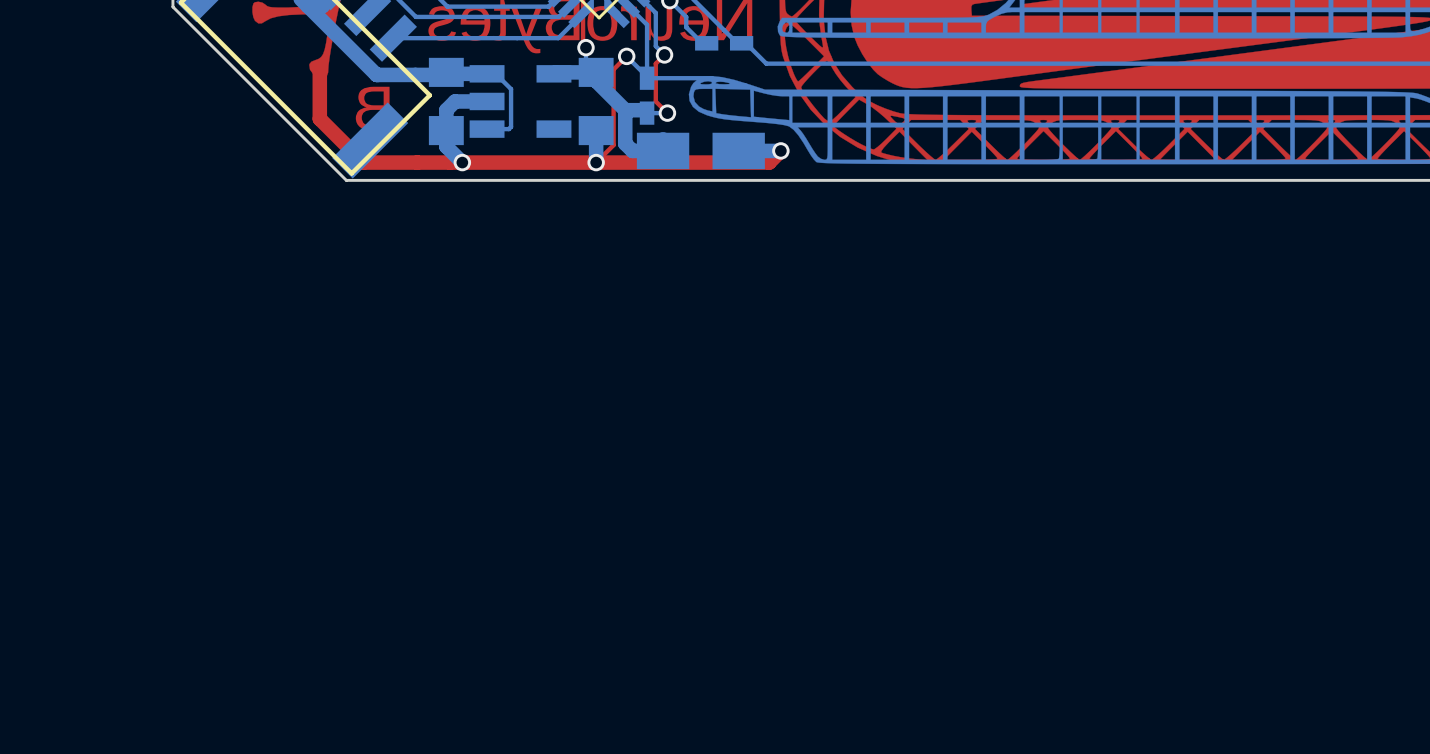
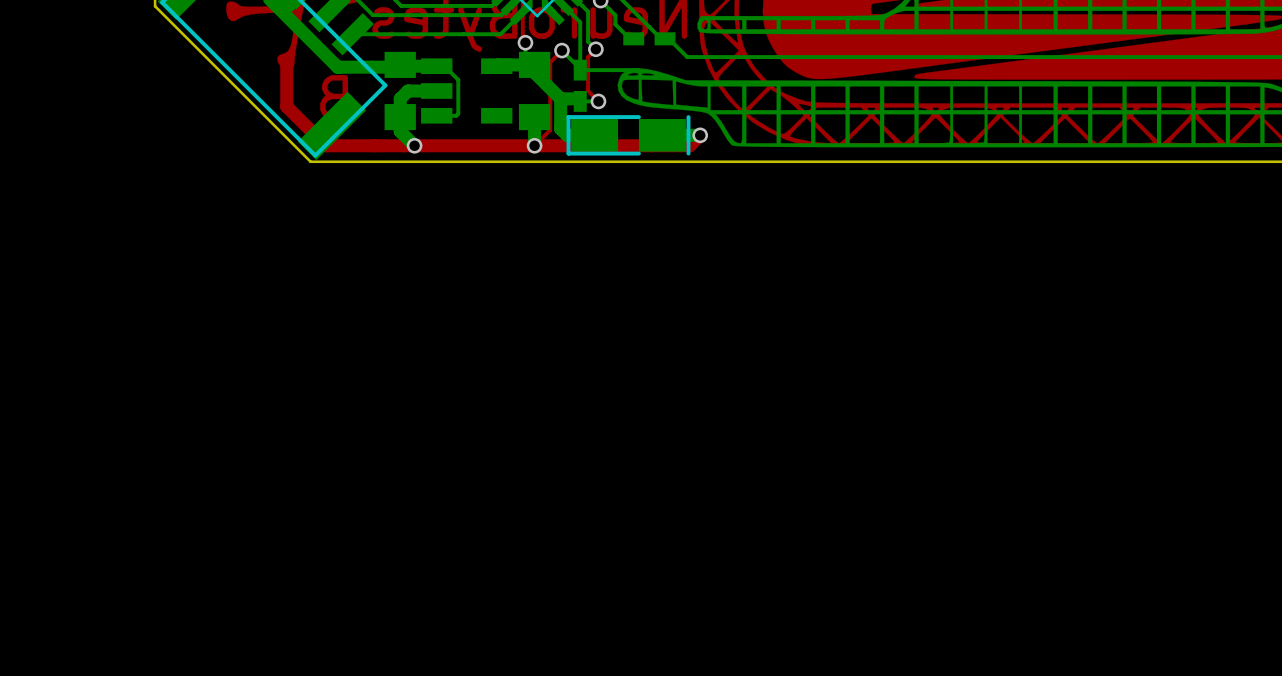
part footprint: [636, 132, 765, 170] -> [566, 115, 691, 156]

